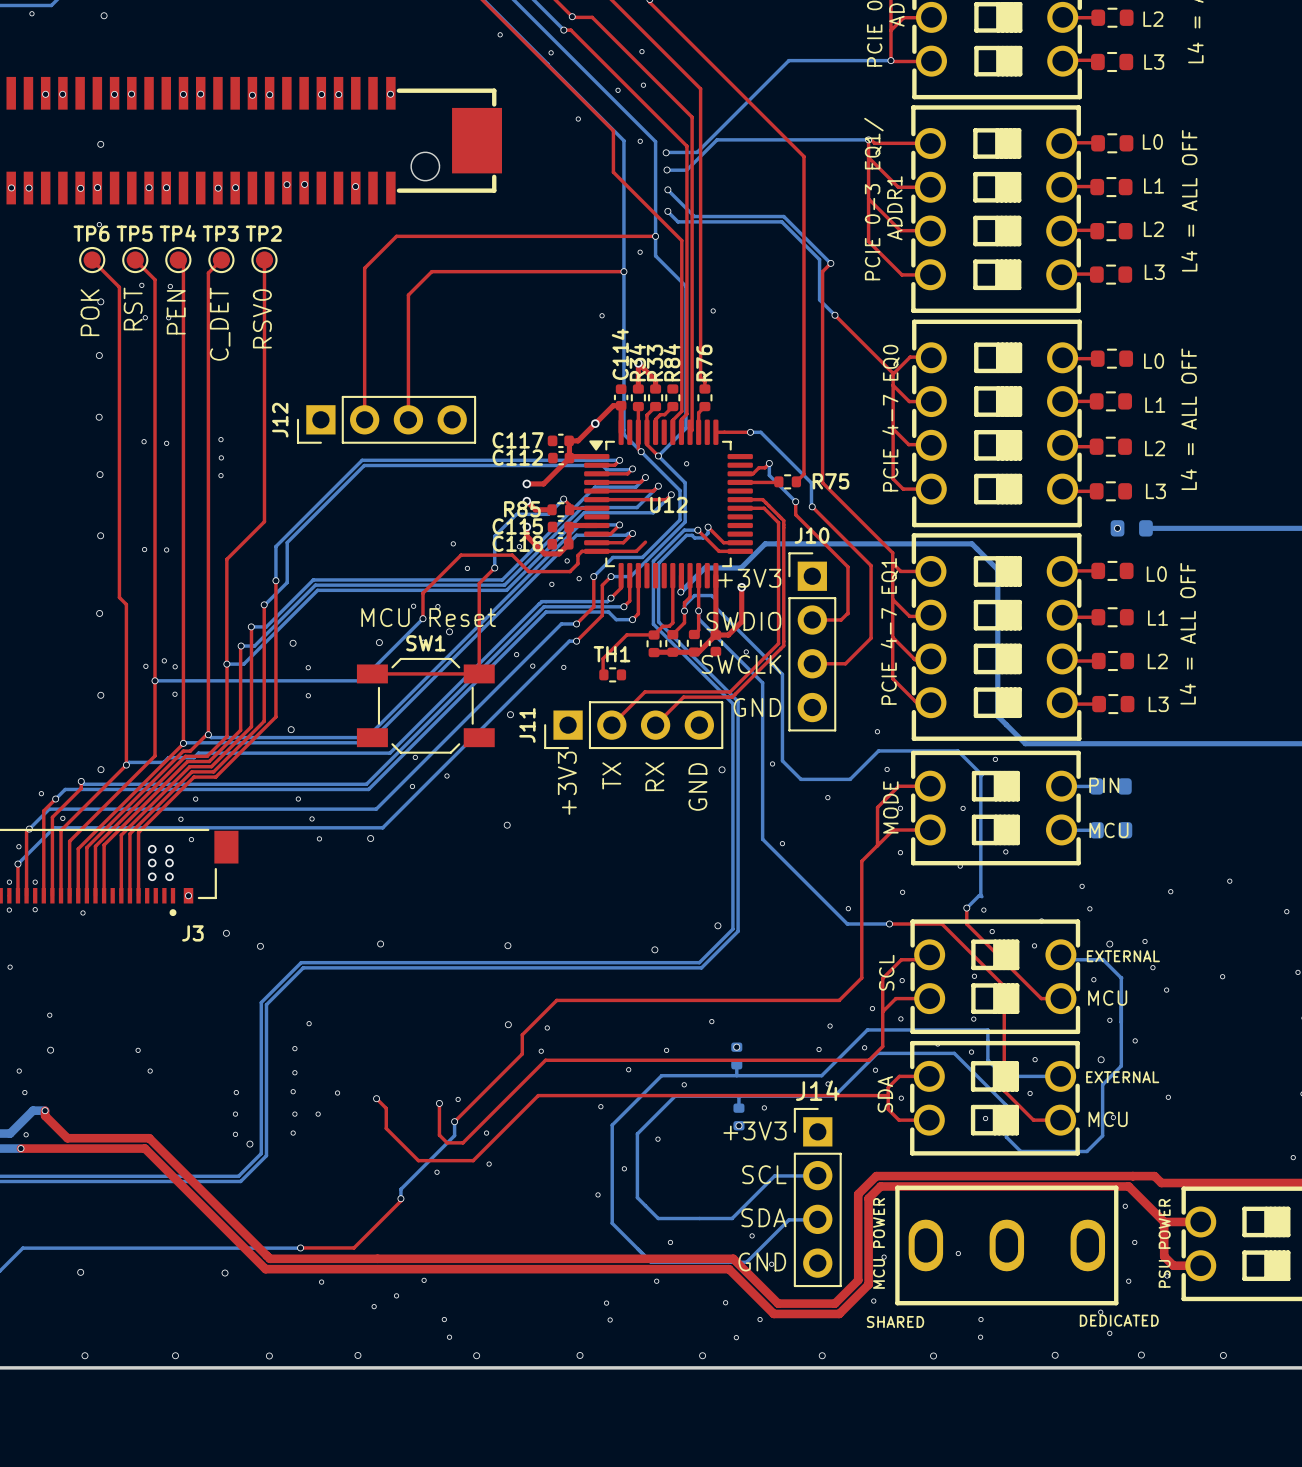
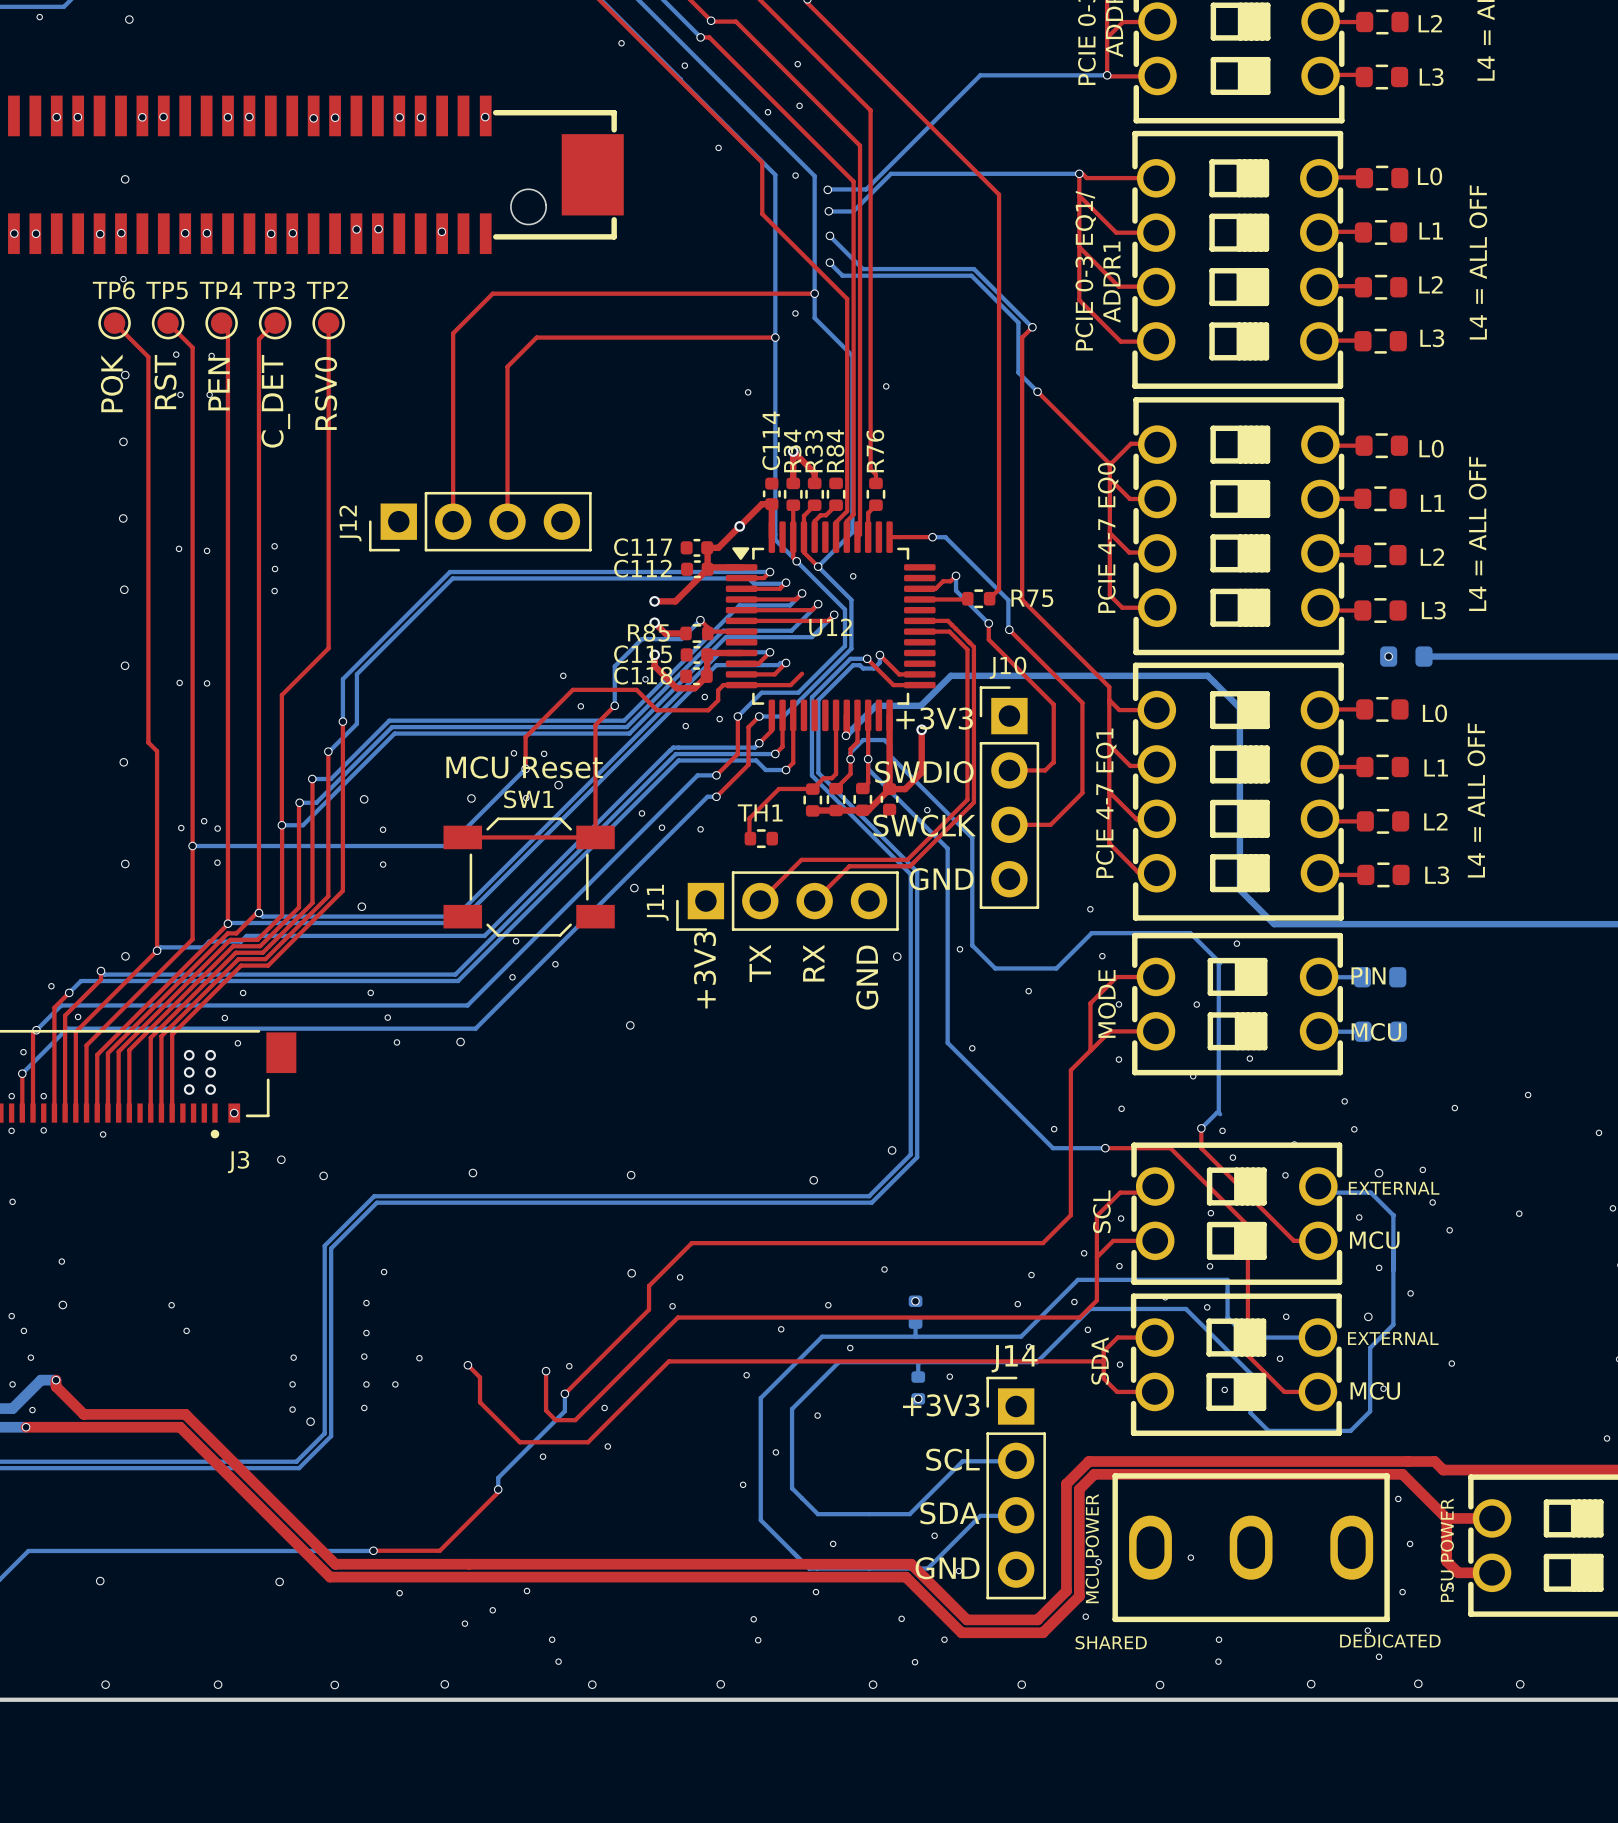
via: none -> (11, 1316)
via: none -> (12, 1384)

